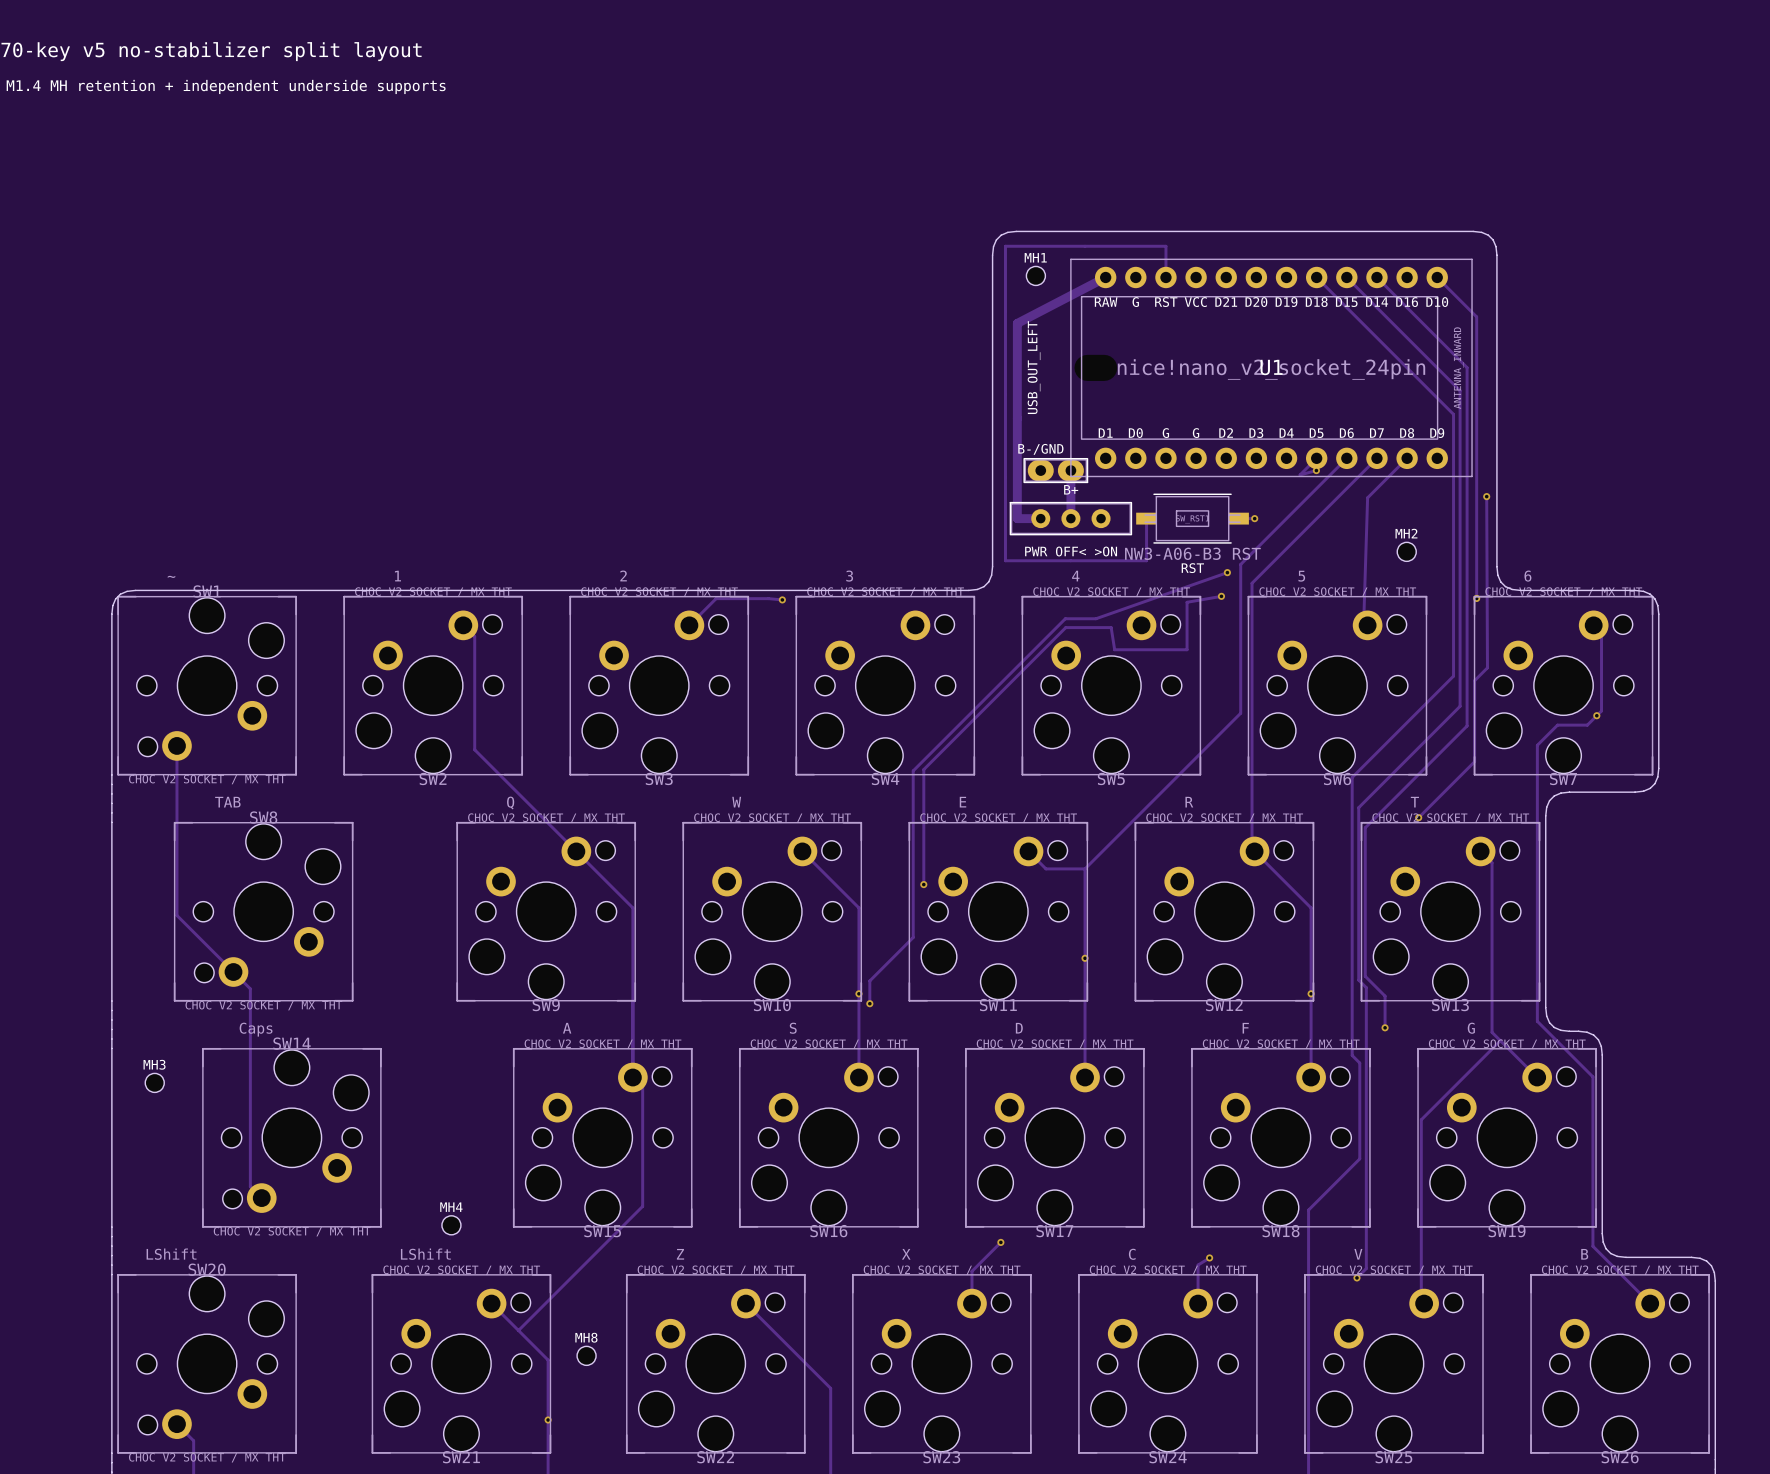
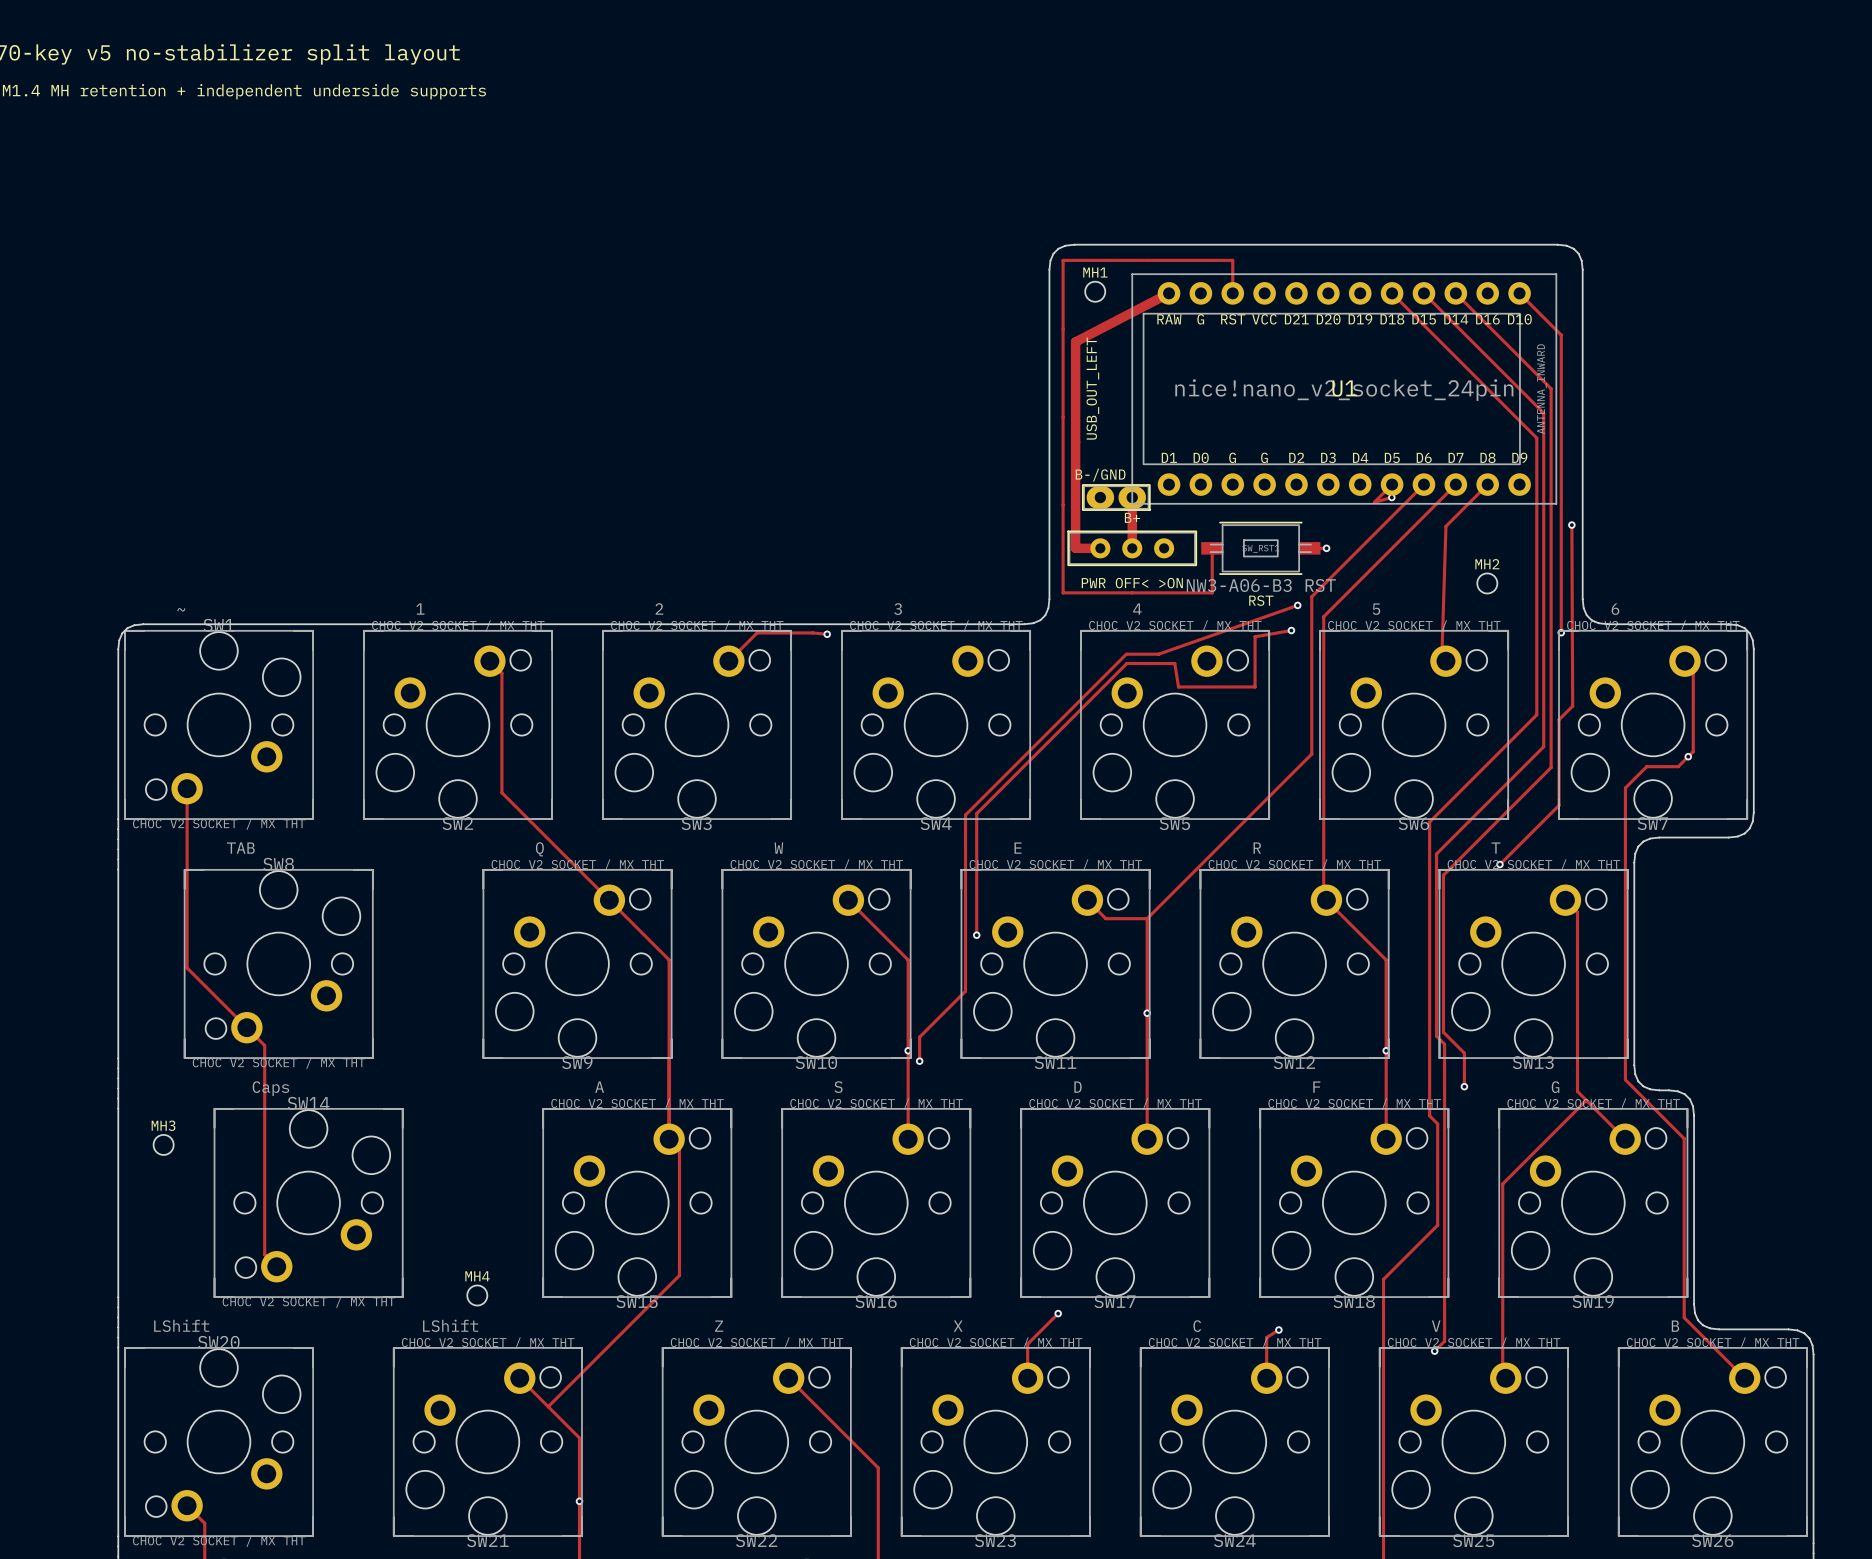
MH8: (586, 1355) -> none

